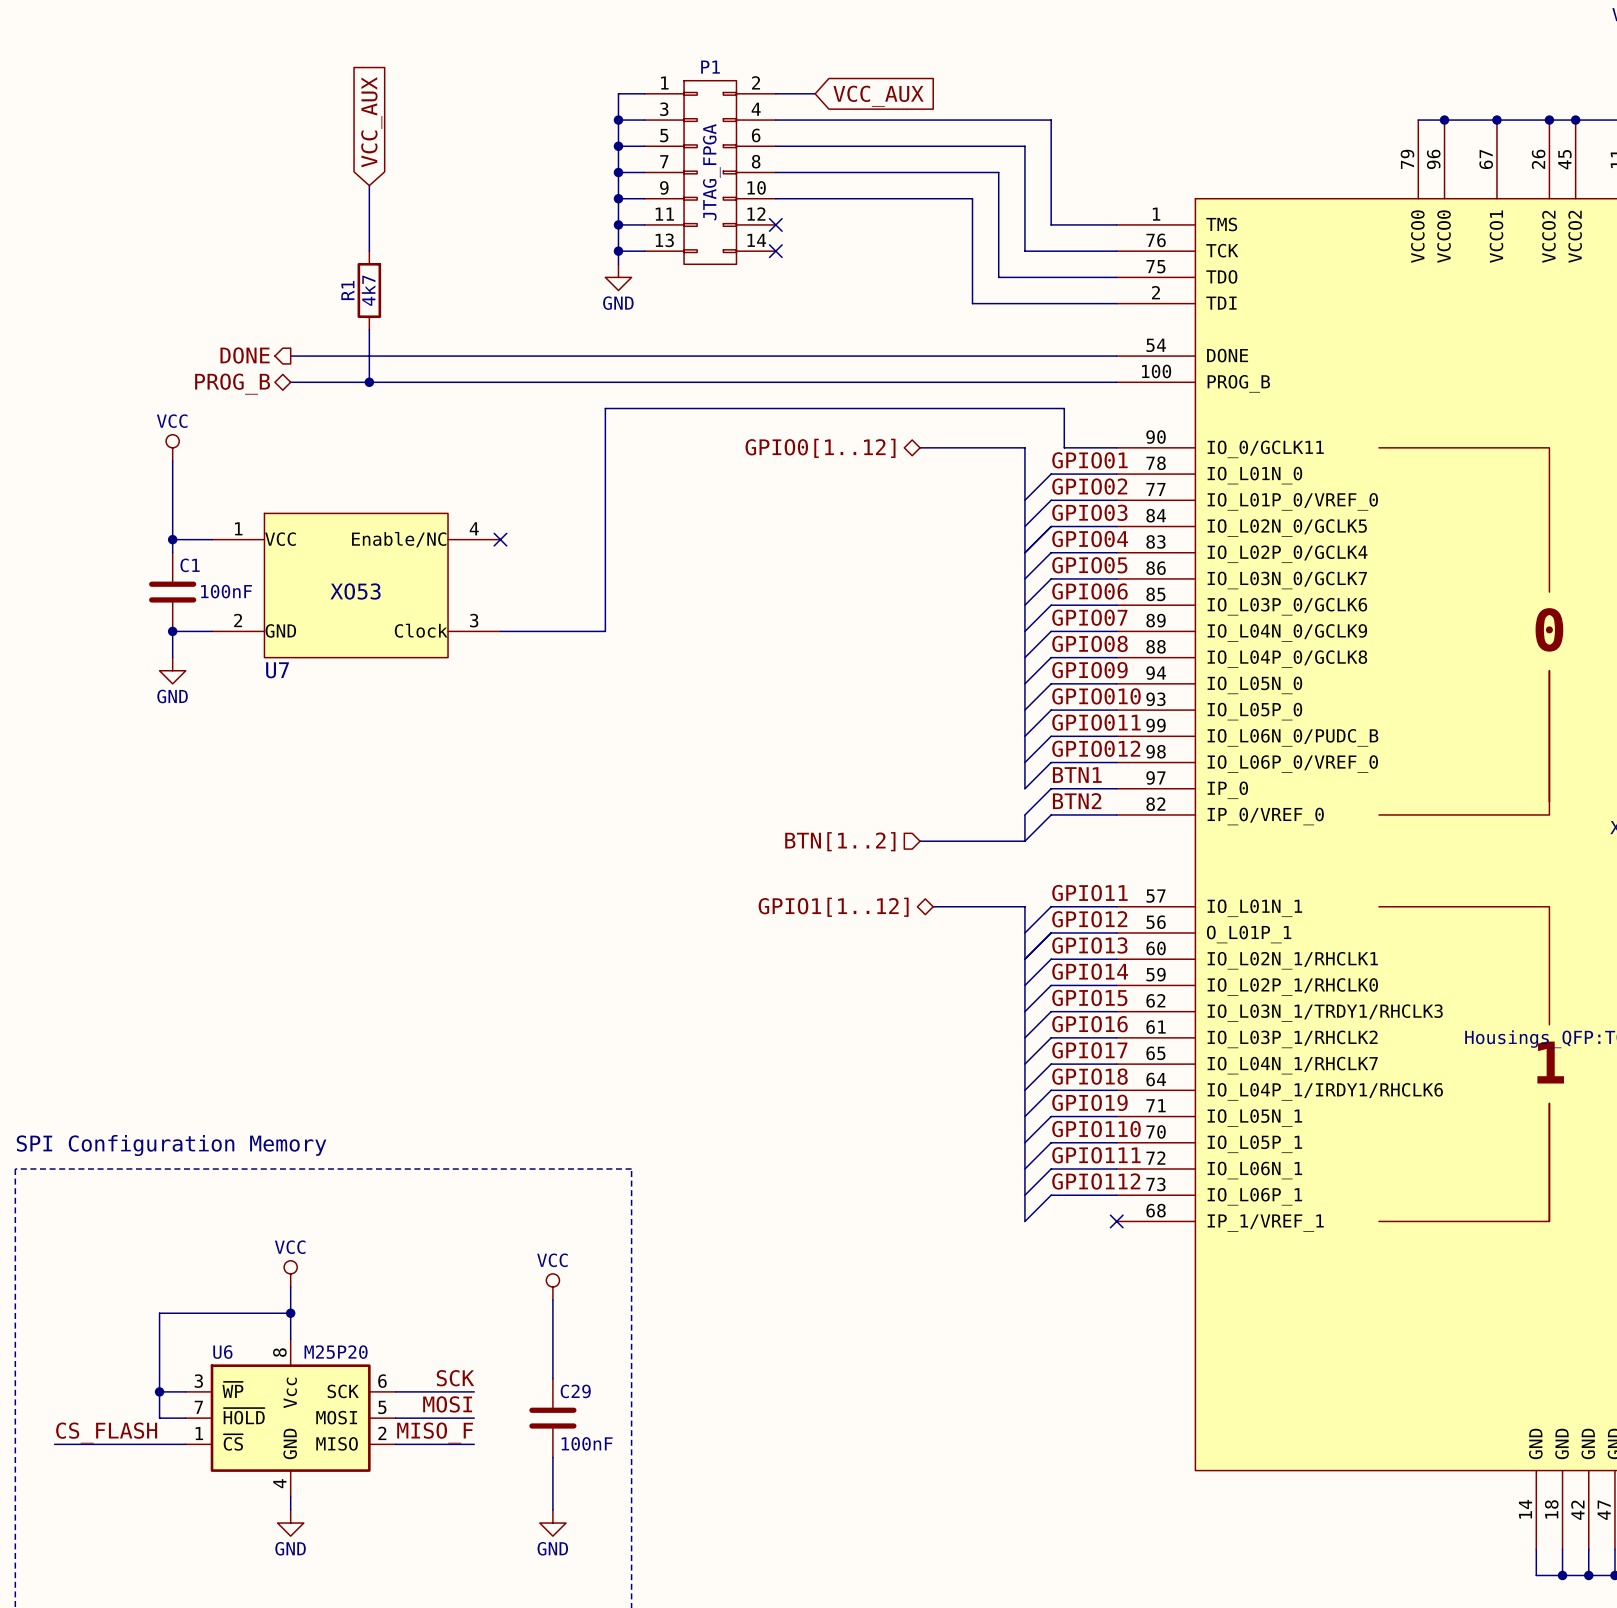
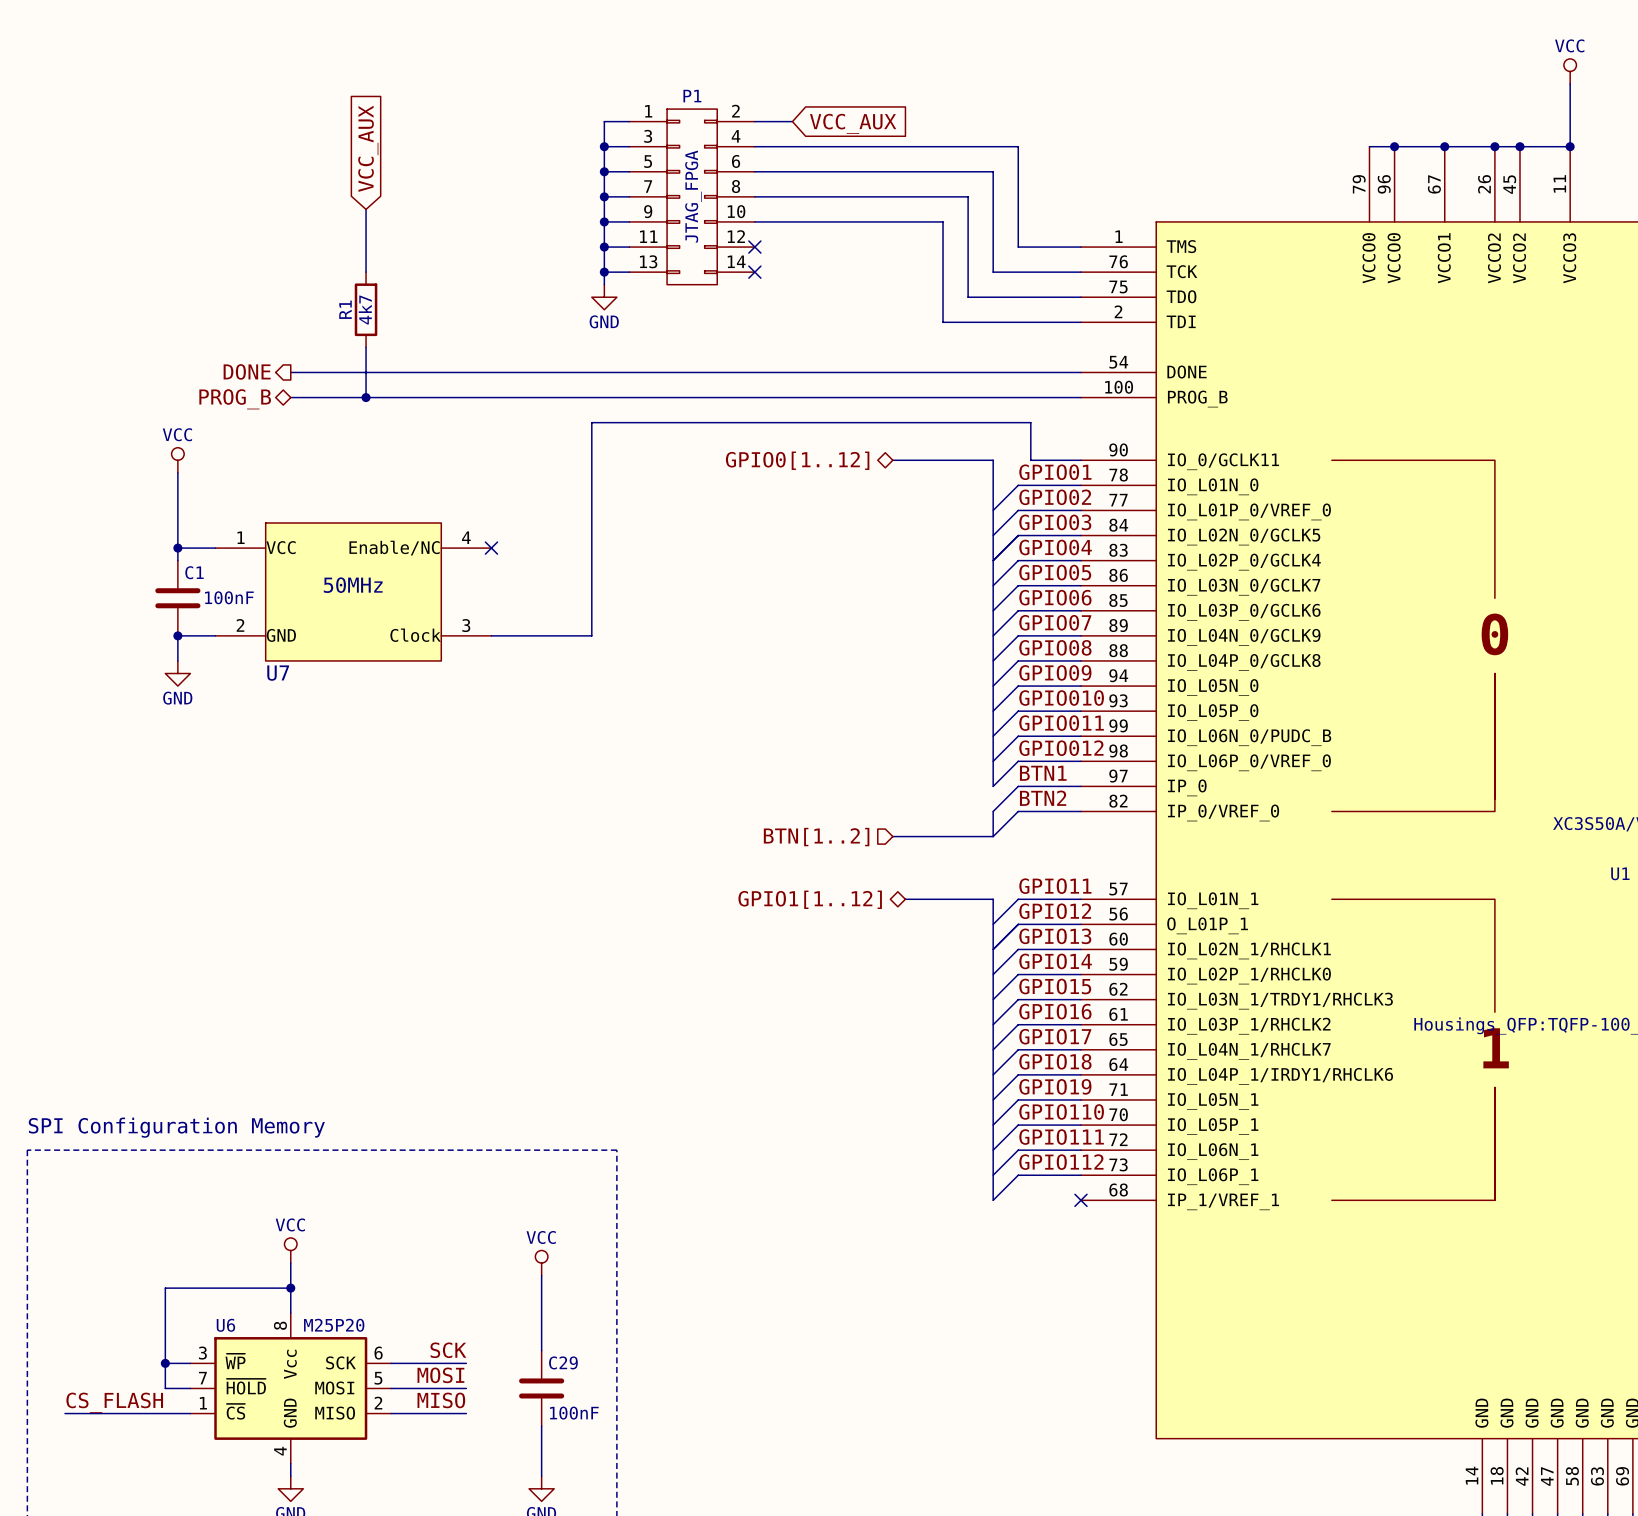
U7 value: XO53 (355, 591) -> 50MHz (353, 585)
label: MISO_F (435, 1433) -> MISO (441, 1400)

